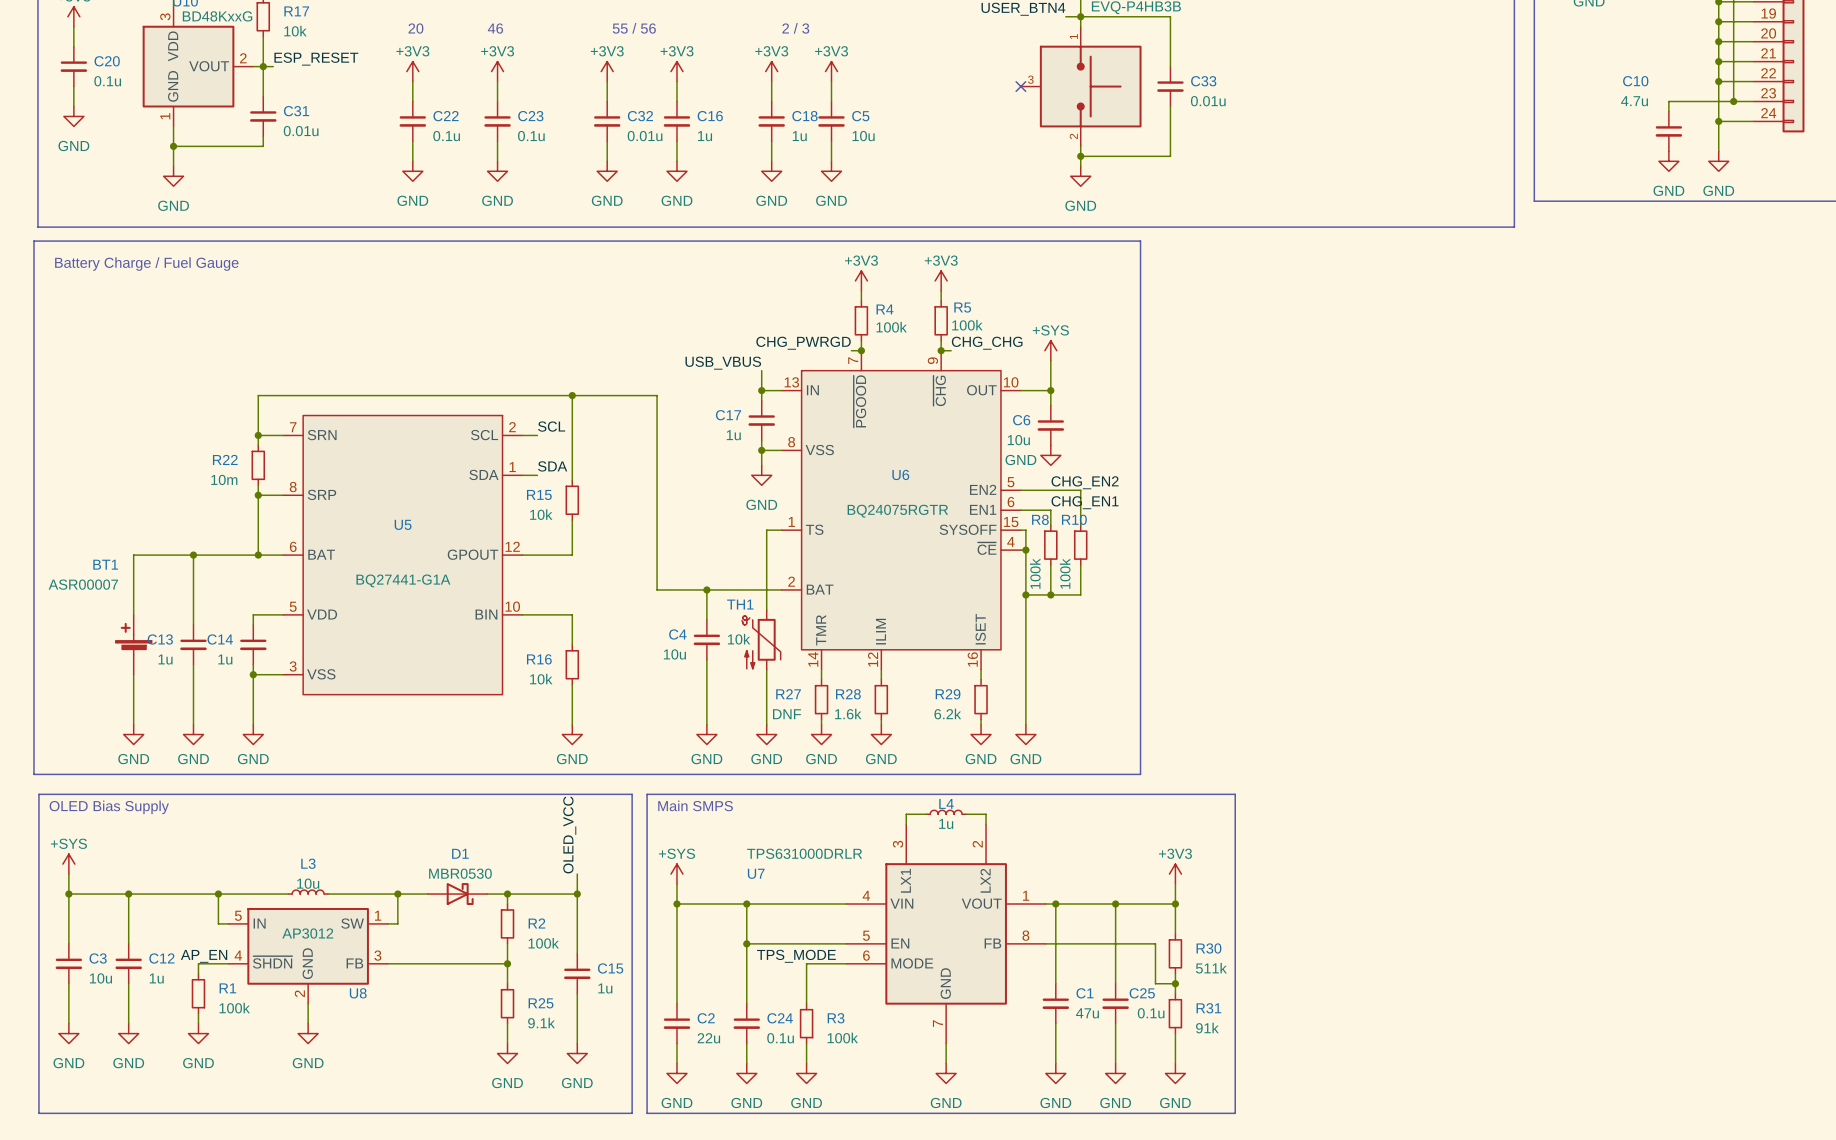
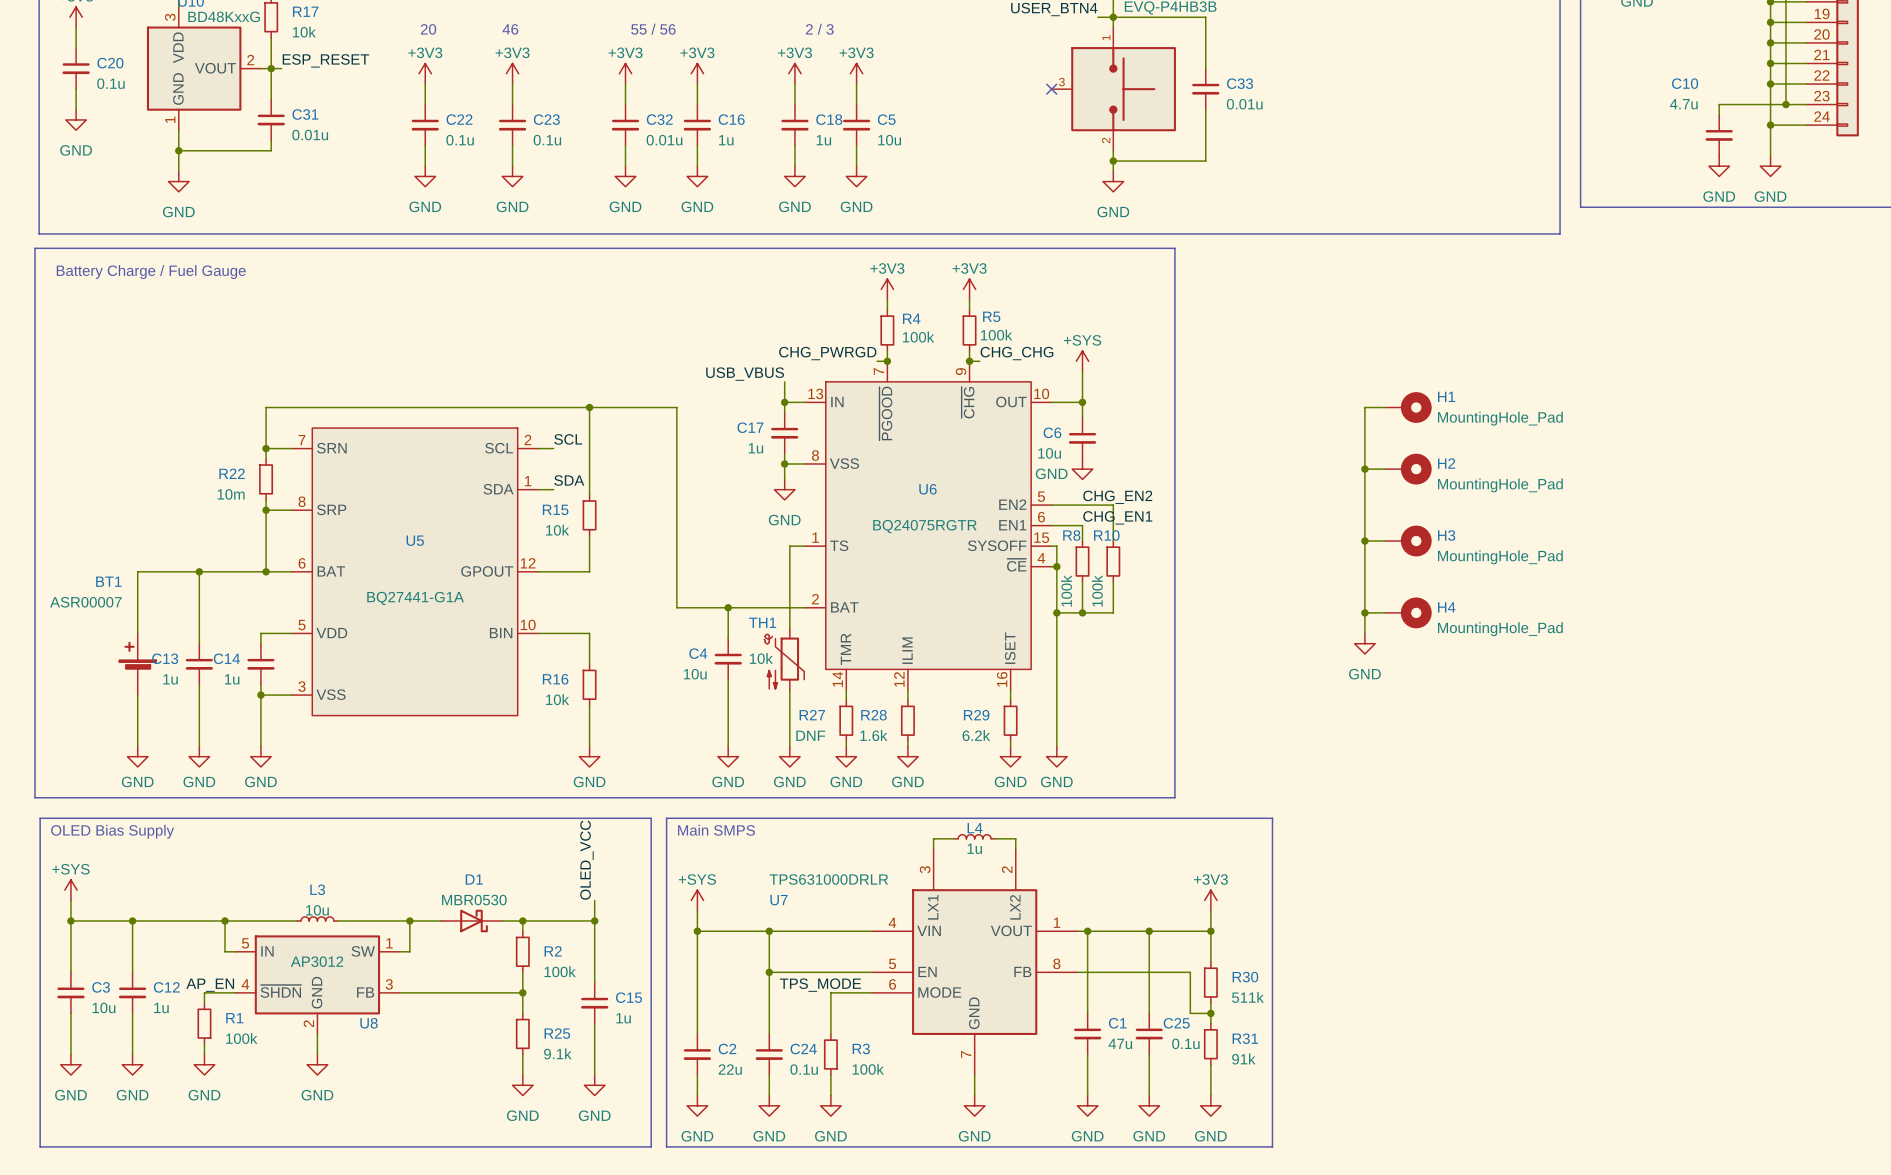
wire: none -> (1385, 407) (1364, 407) (1364, 633)
H1: none -> MountingHole_Pad (1408, 407)
wire: none -> (1364, 469) (1385, 469)
junction: none -> (1364, 469)
H2: none -> MountingHole_Pad (1408, 469)
wire: none -> (1364, 541) (1385, 541)
junction: none -> (1364, 541)
H3: none -> MountingHole_Pad (1408, 541)
wire: none -> (1364, 612) (1385, 612)
junction: none -> (1364, 612)
H4: none -> MountingHole_Pad (1408, 612)
power symbol: none -> GND (1364, 643)

